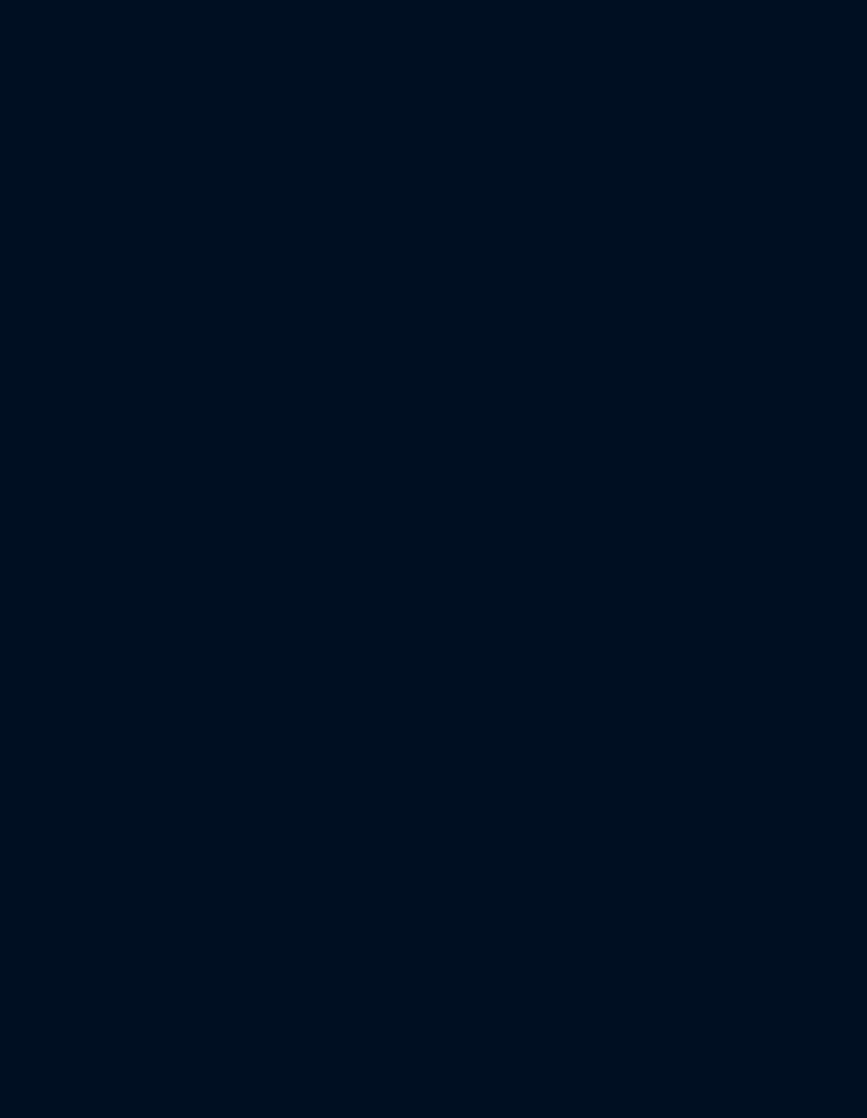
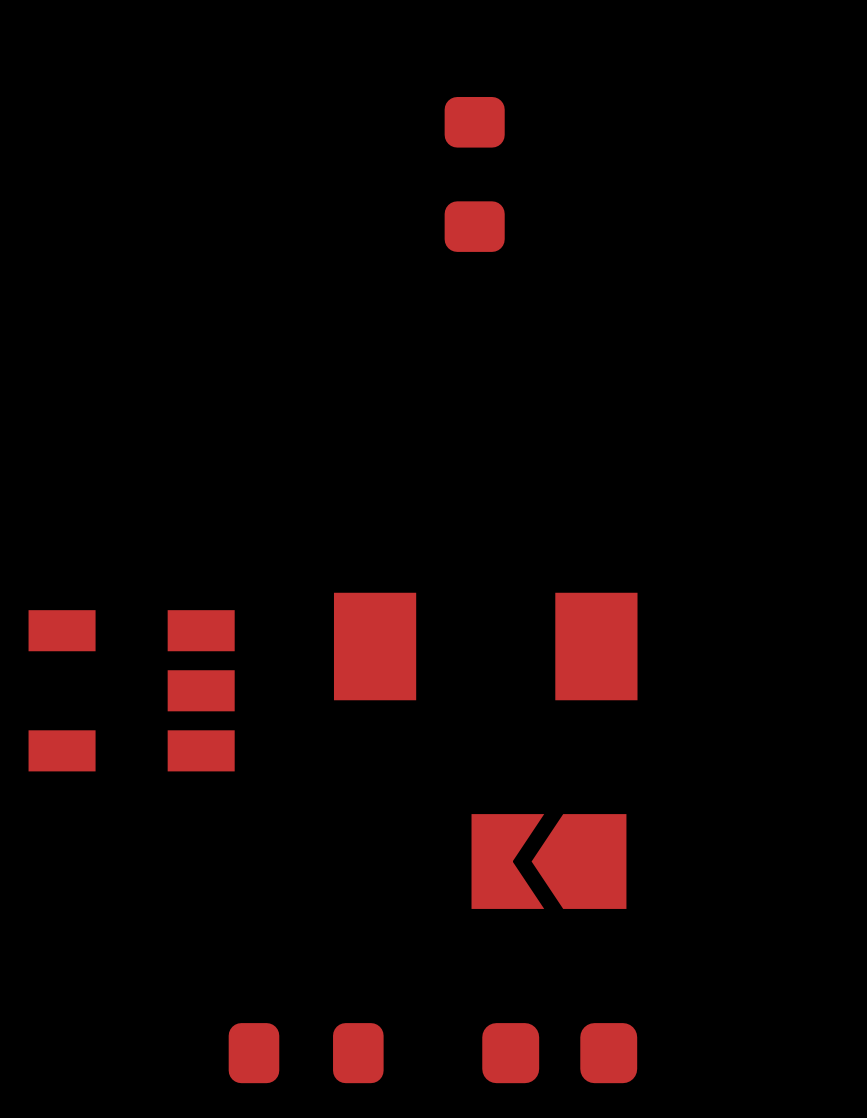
part: none -> (474, 174)
part: none -> (485, 646)
part: none -> (131, 690)
part: none -> (548, 861)
part: none -> (306, 1053)
part: none -> (559, 1053)

